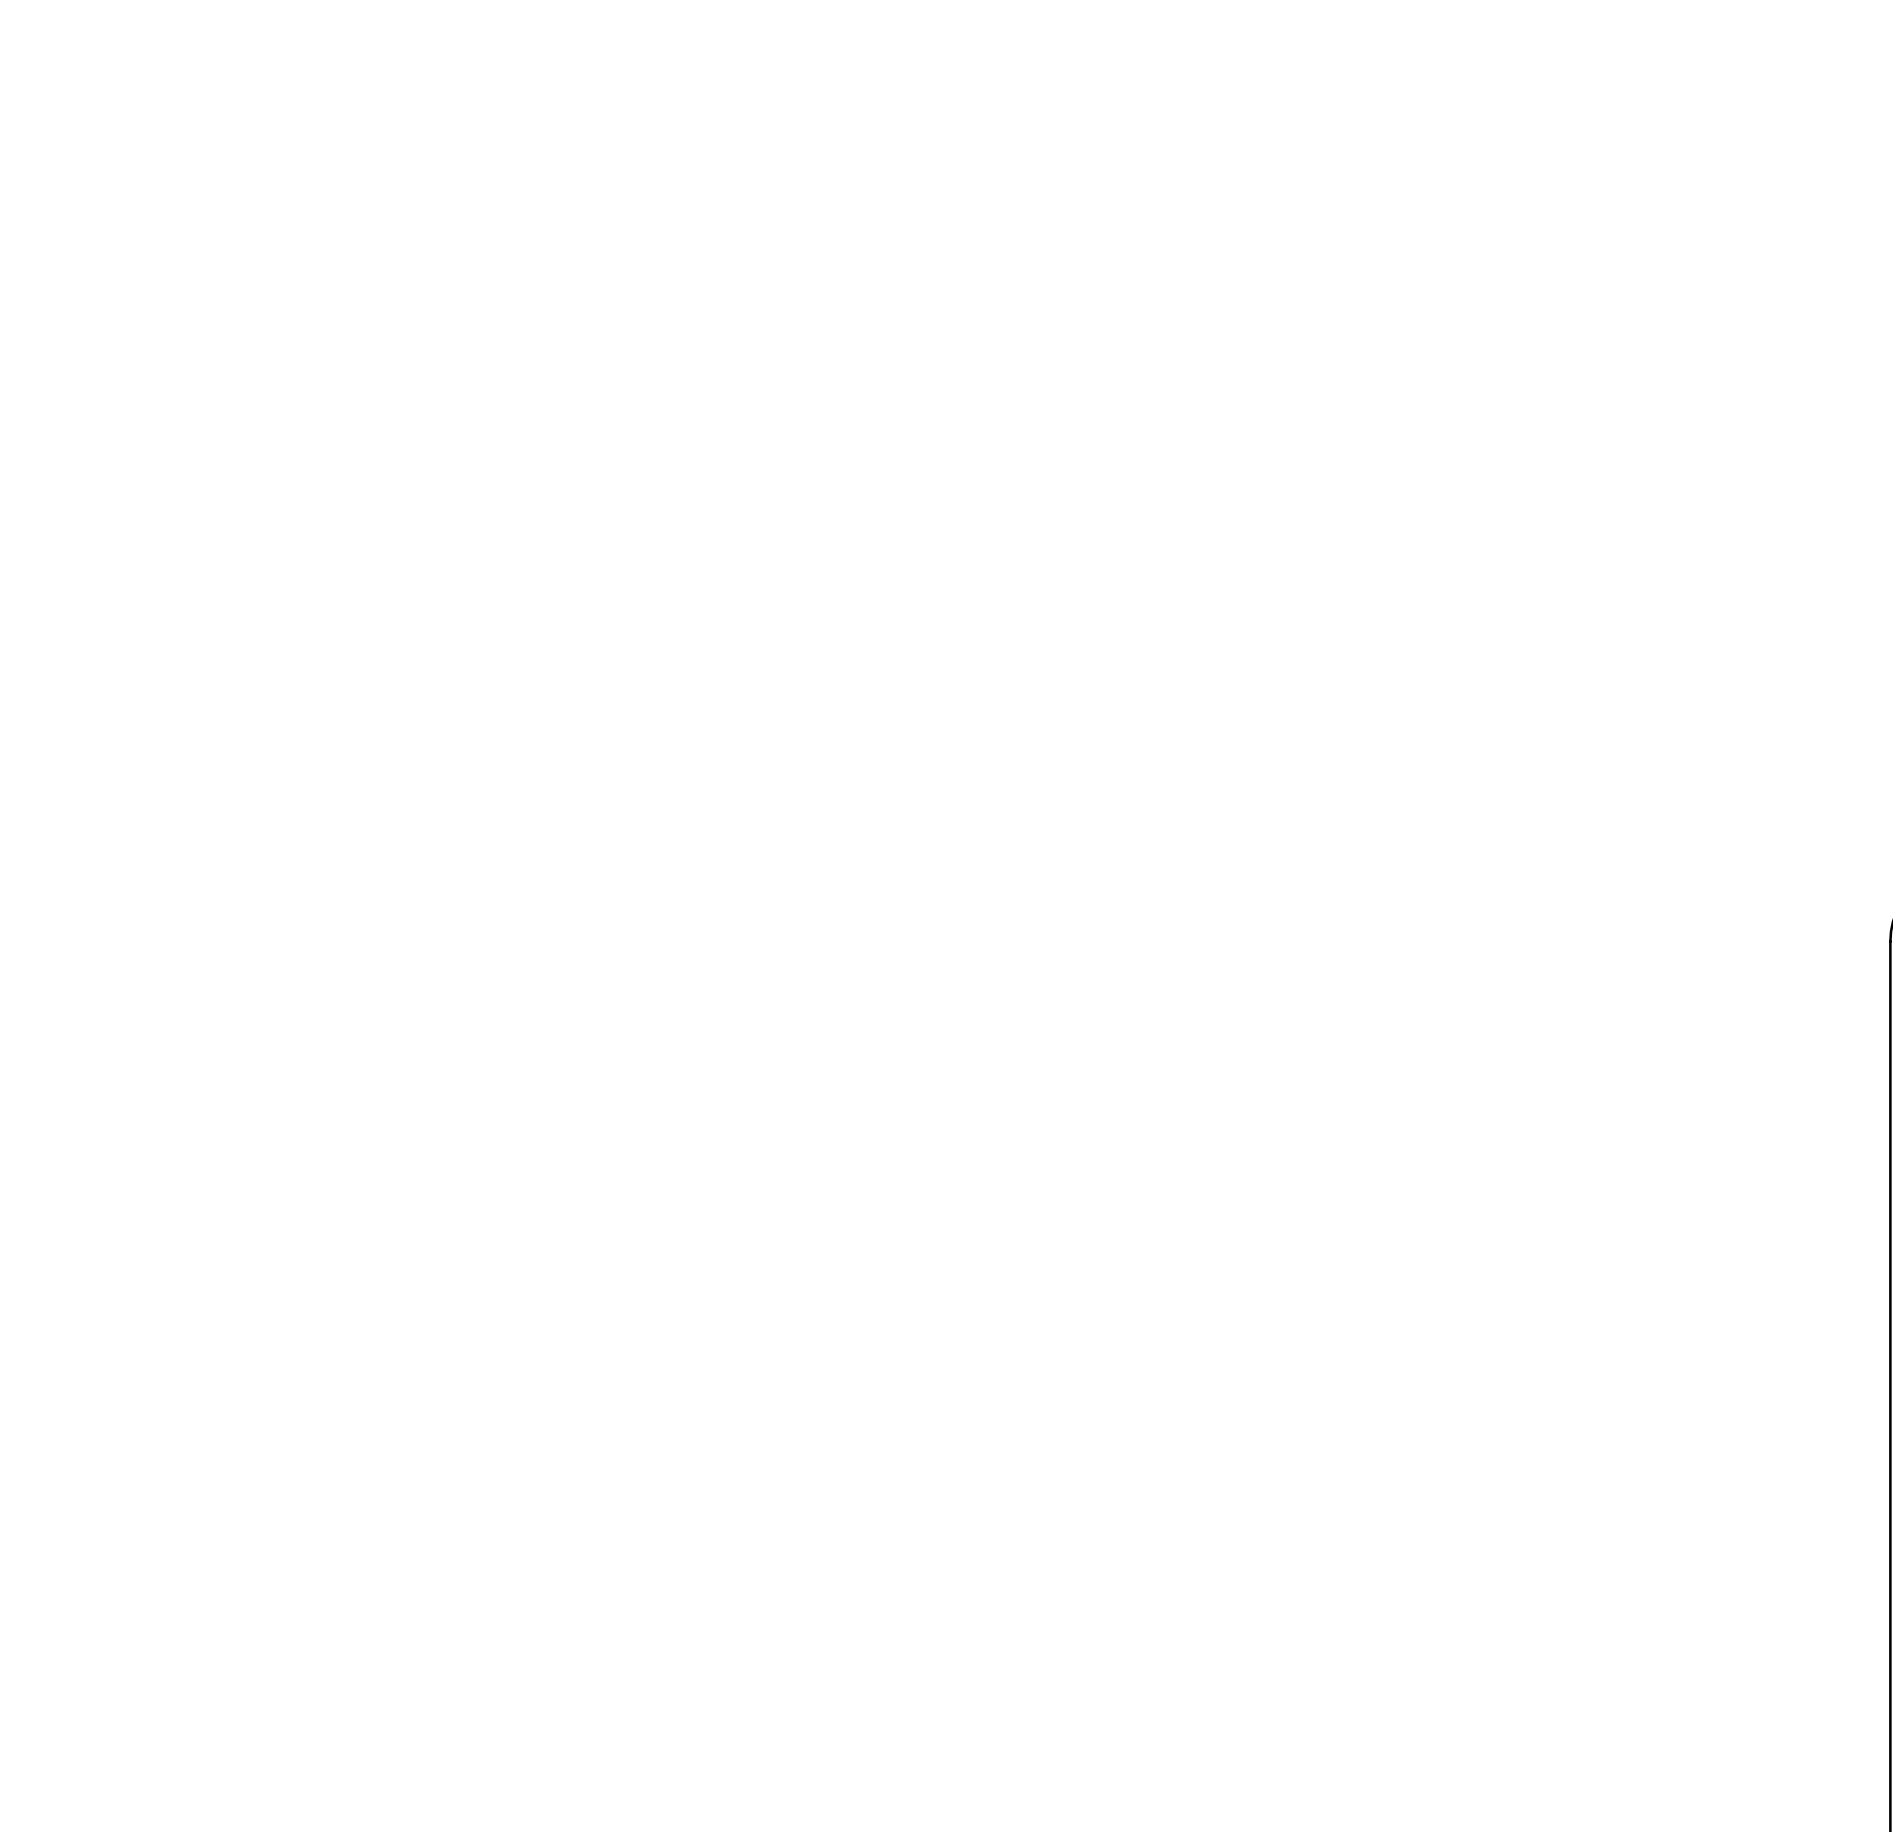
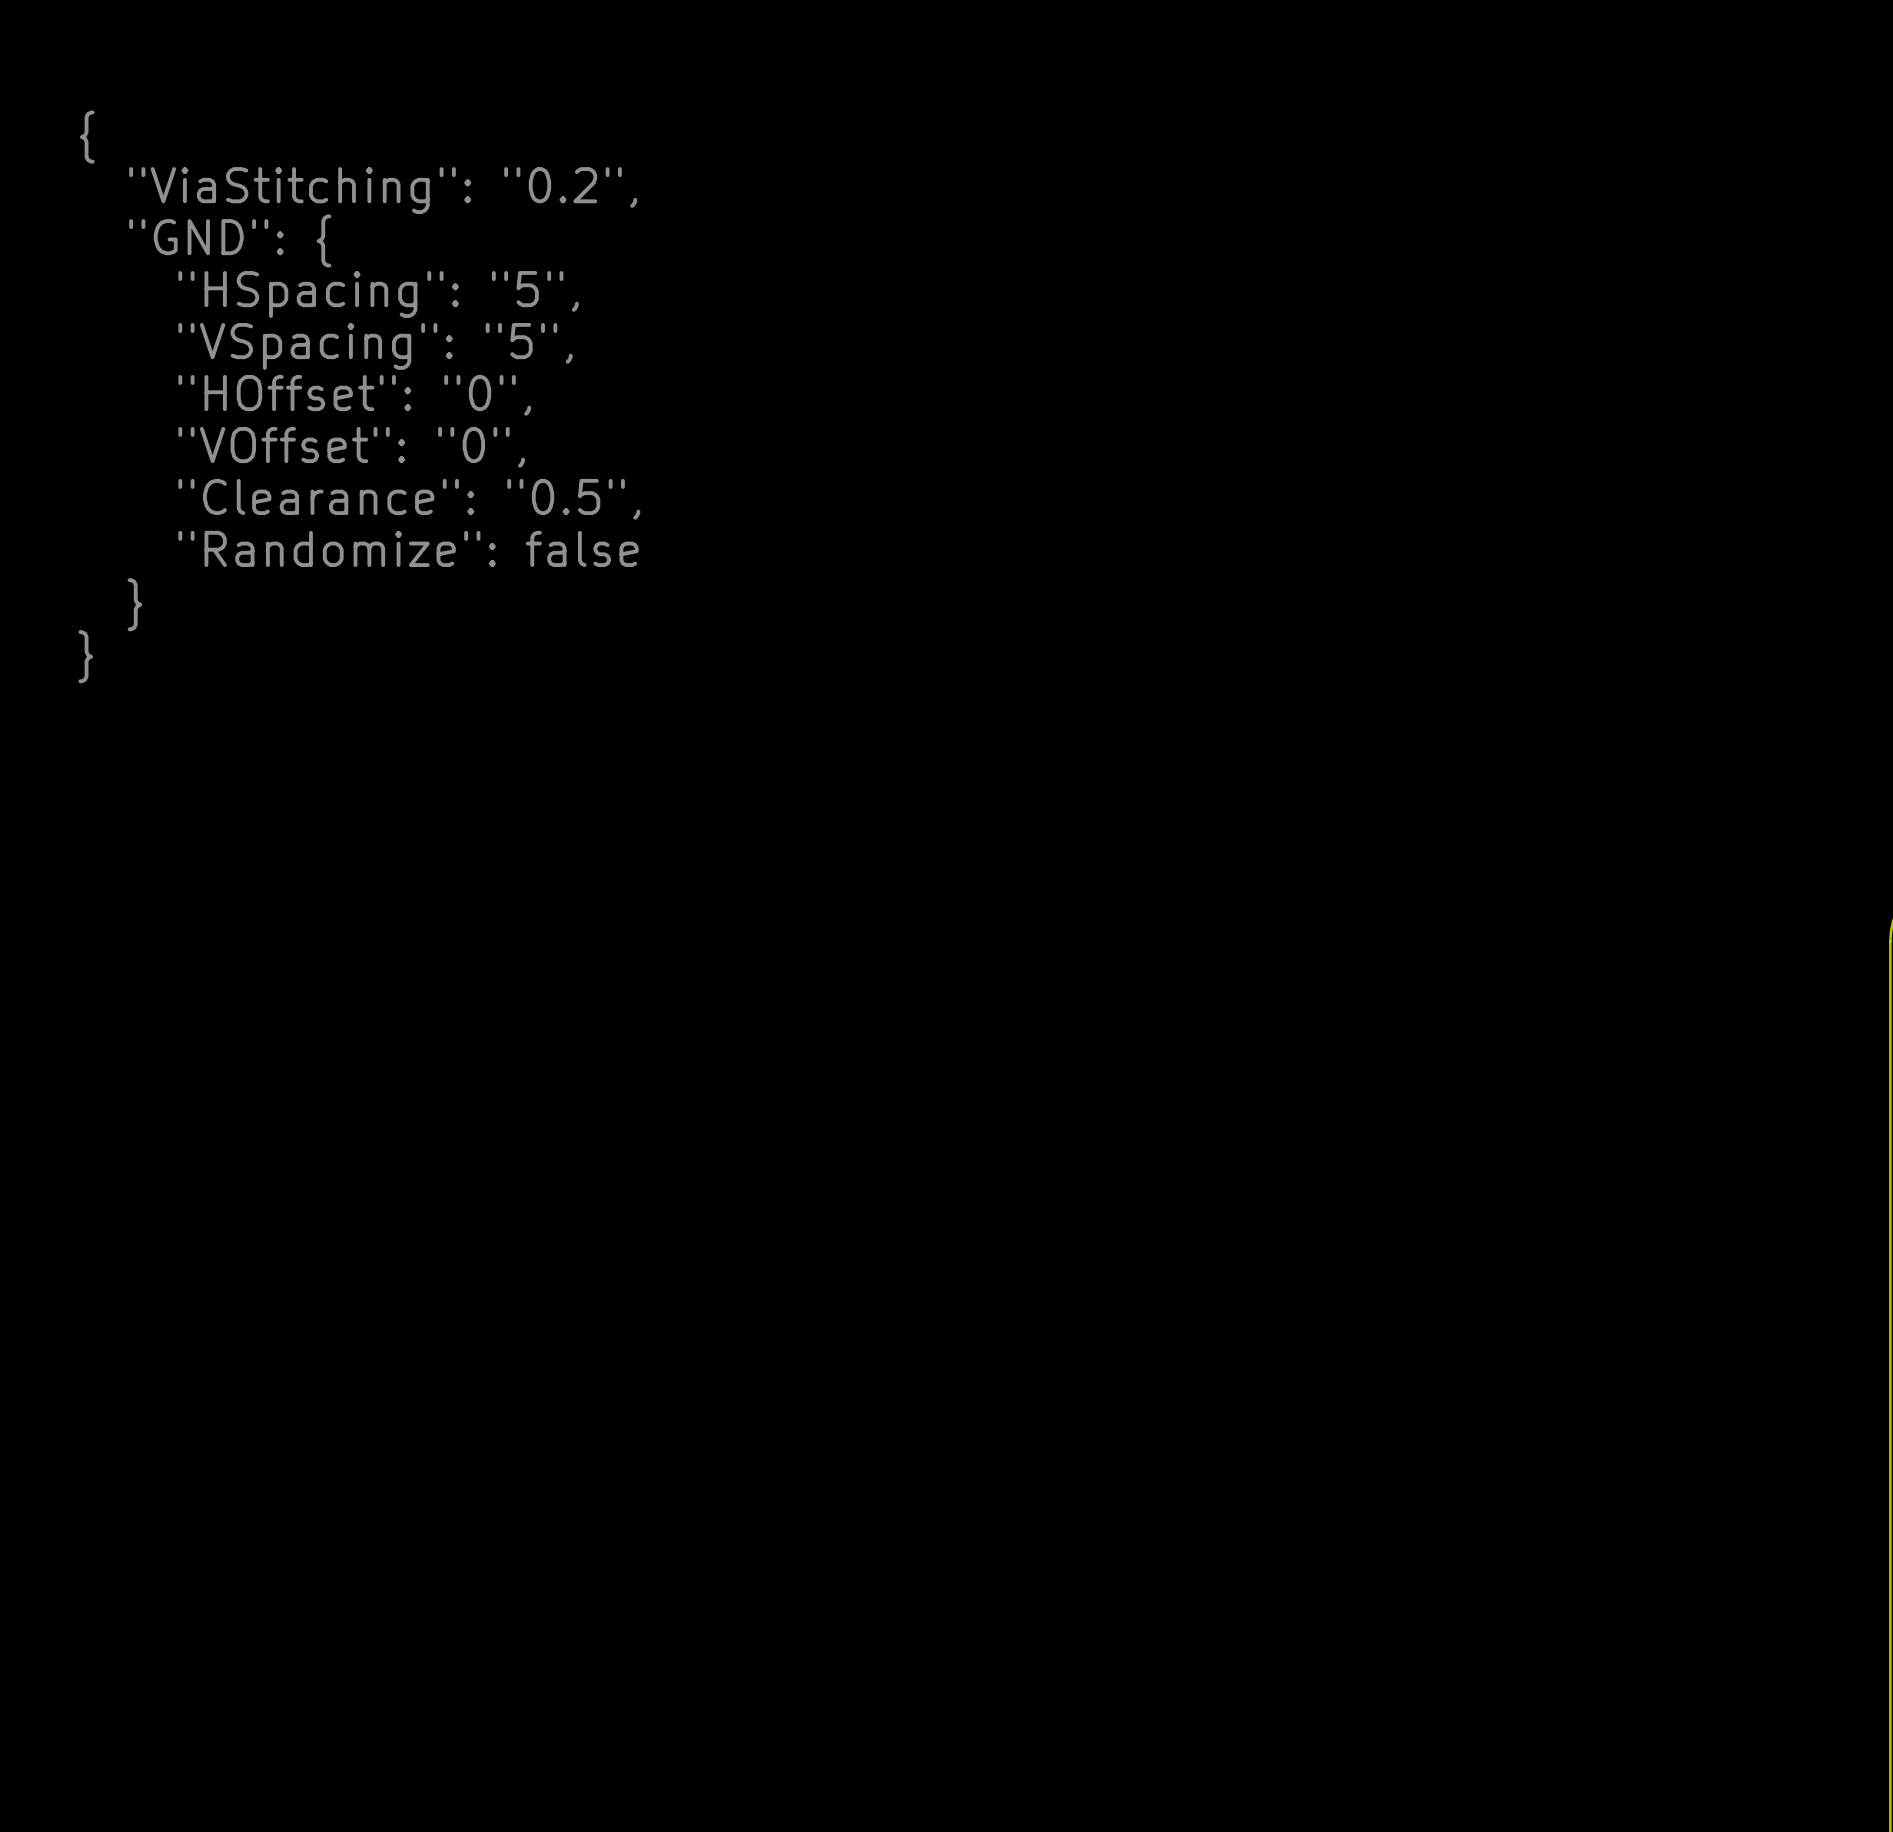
text: none -> { (87, 137)
text: none -> "ViaStitching": "0.2", (383, 190)
text: none -> "GND": { (230, 240)
text: none -> "HSpacing": "5", (378, 294)
text: none -> "VSpacing": "5", (375, 346)
text: none -> "HOffset": "0", (354, 395)
text: none -> "VOffset": "0", (351, 447)
text: none -> "Clearance": "0.5", (409, 499)
text: none -> "Randomize": false (408, 548)
text: none -> } (134, 604)
text: none -> } (85, 656)

